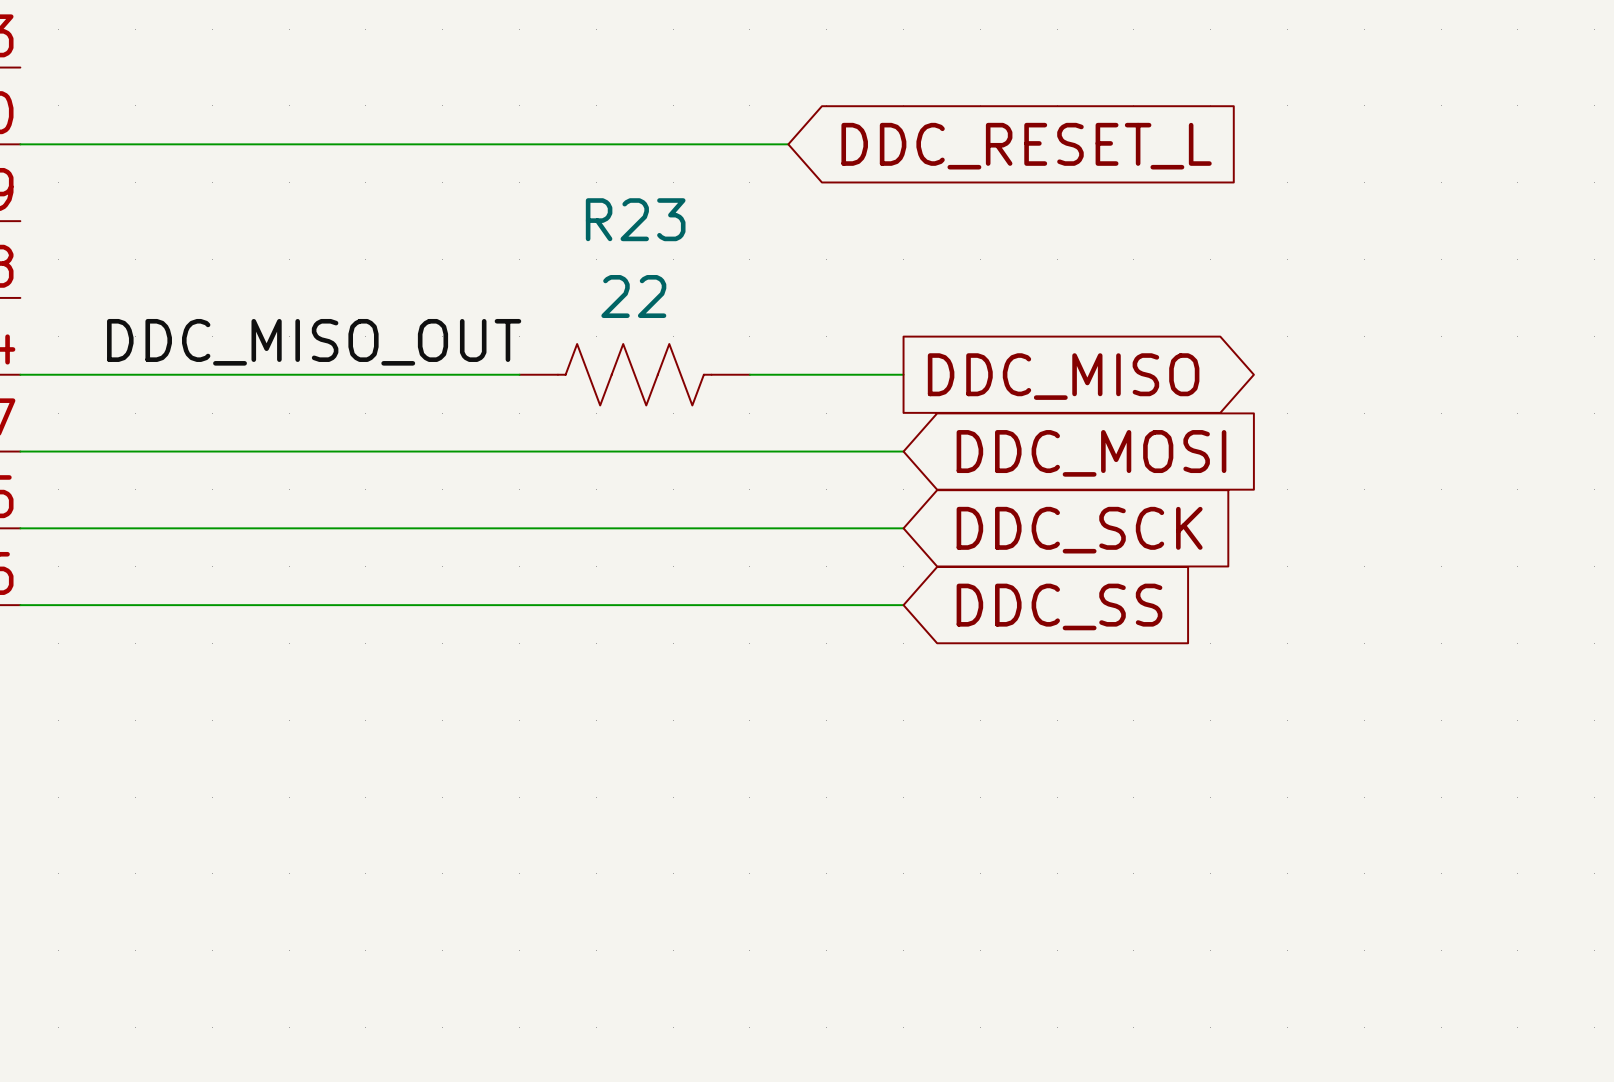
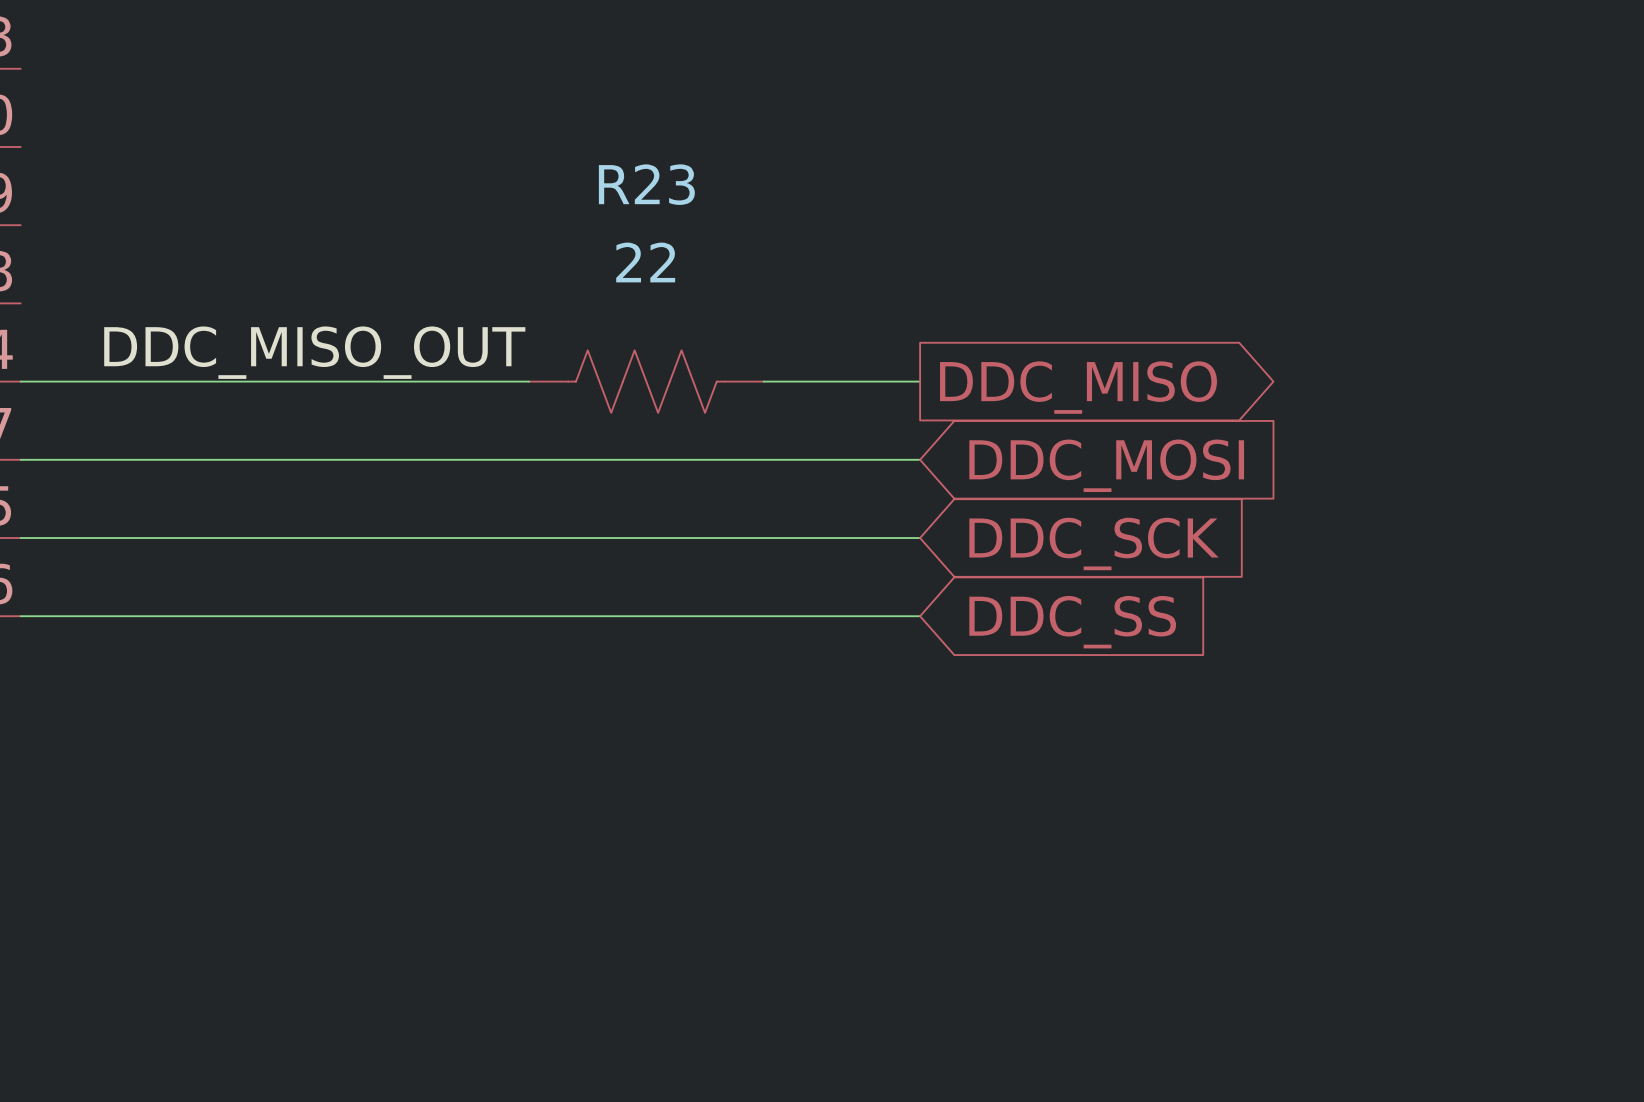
wire: (20, 144) (788, 144) -> none
global label: DDC_RESET_L (1026, 146) -> none
R23 name position: R23 (635, 219) -> R23 (646, 184)
R23 value position: 22 (633, 296) -> 22 (645, 262)

